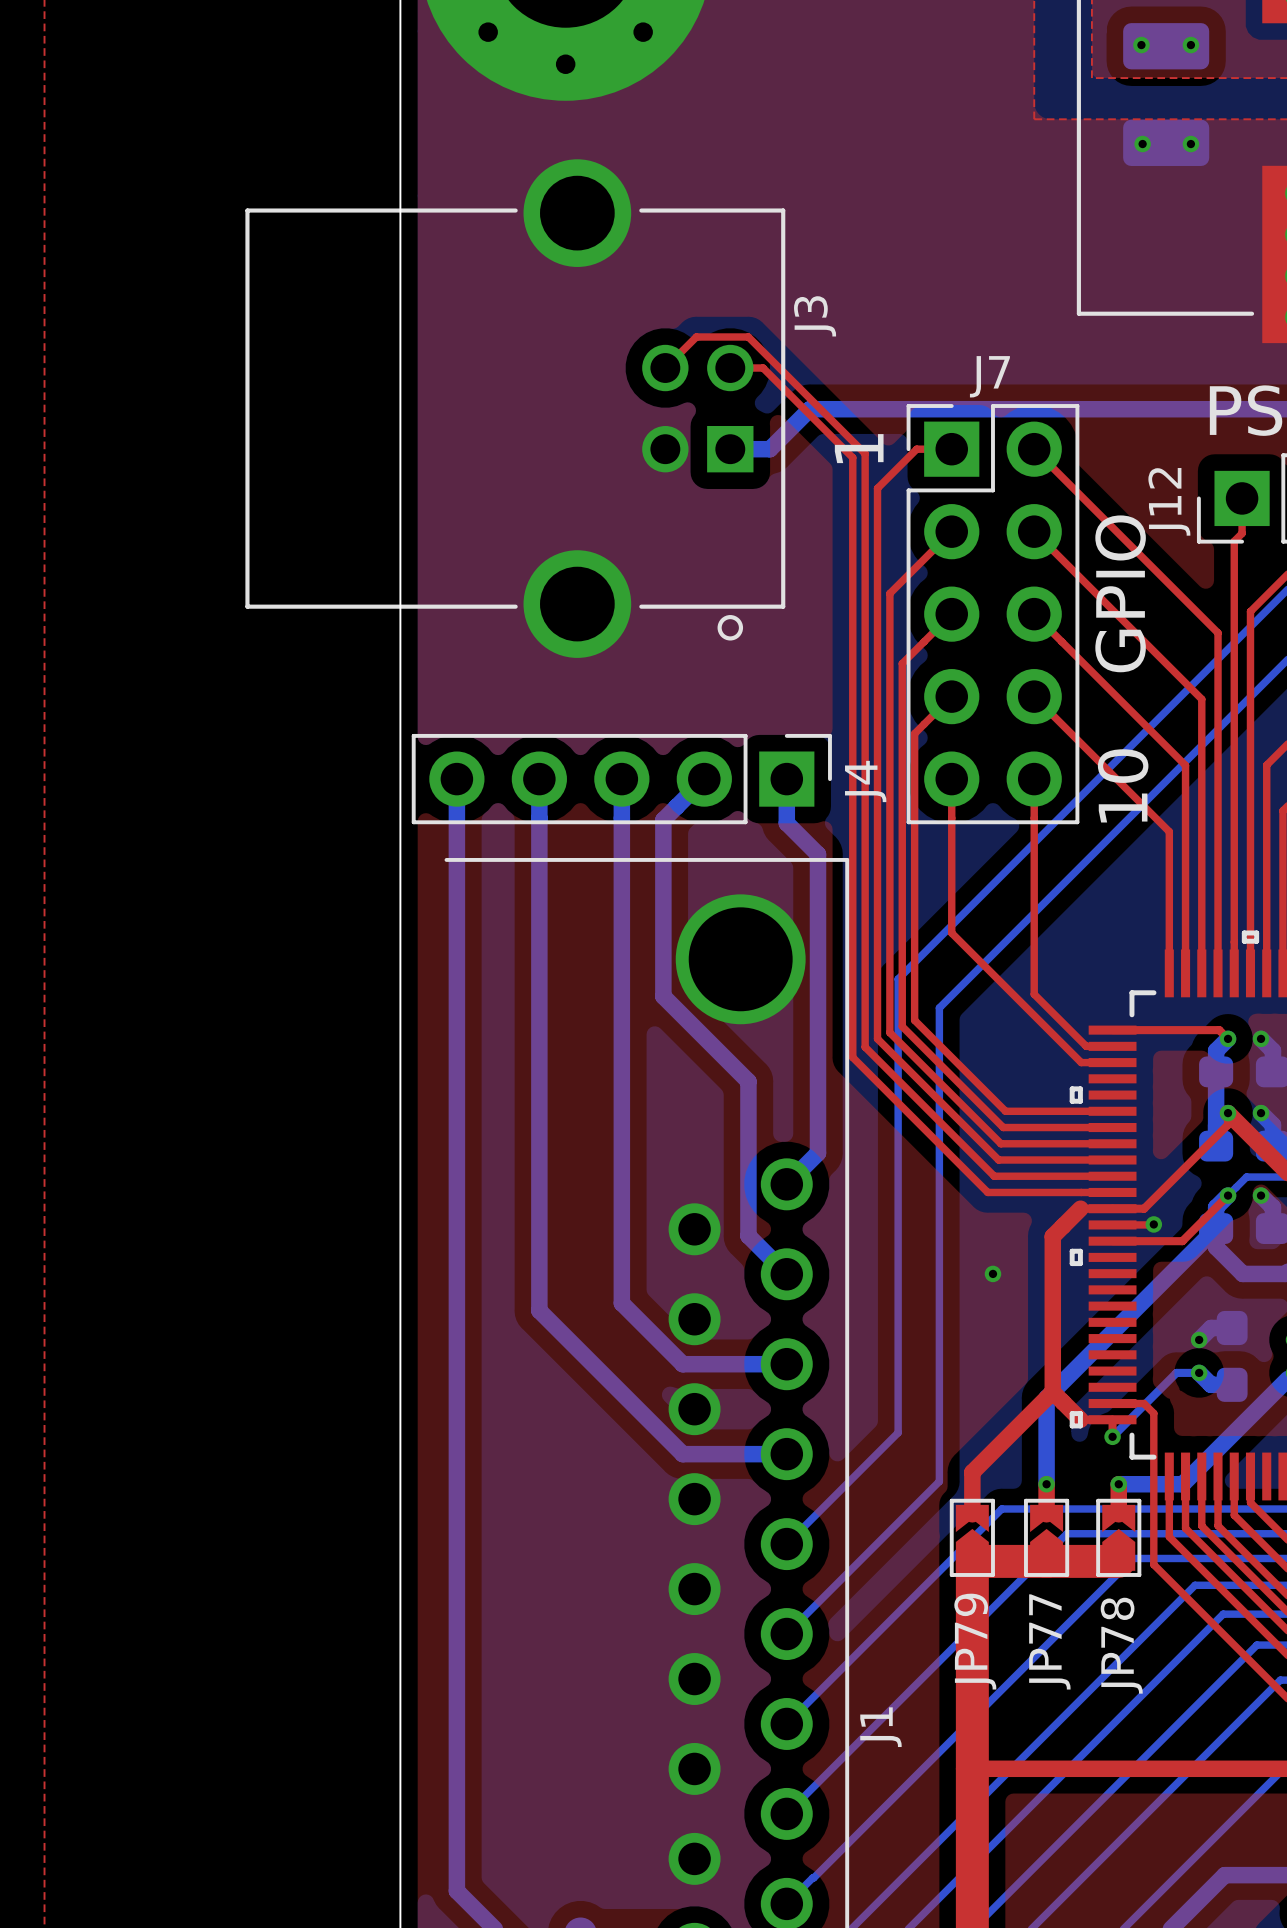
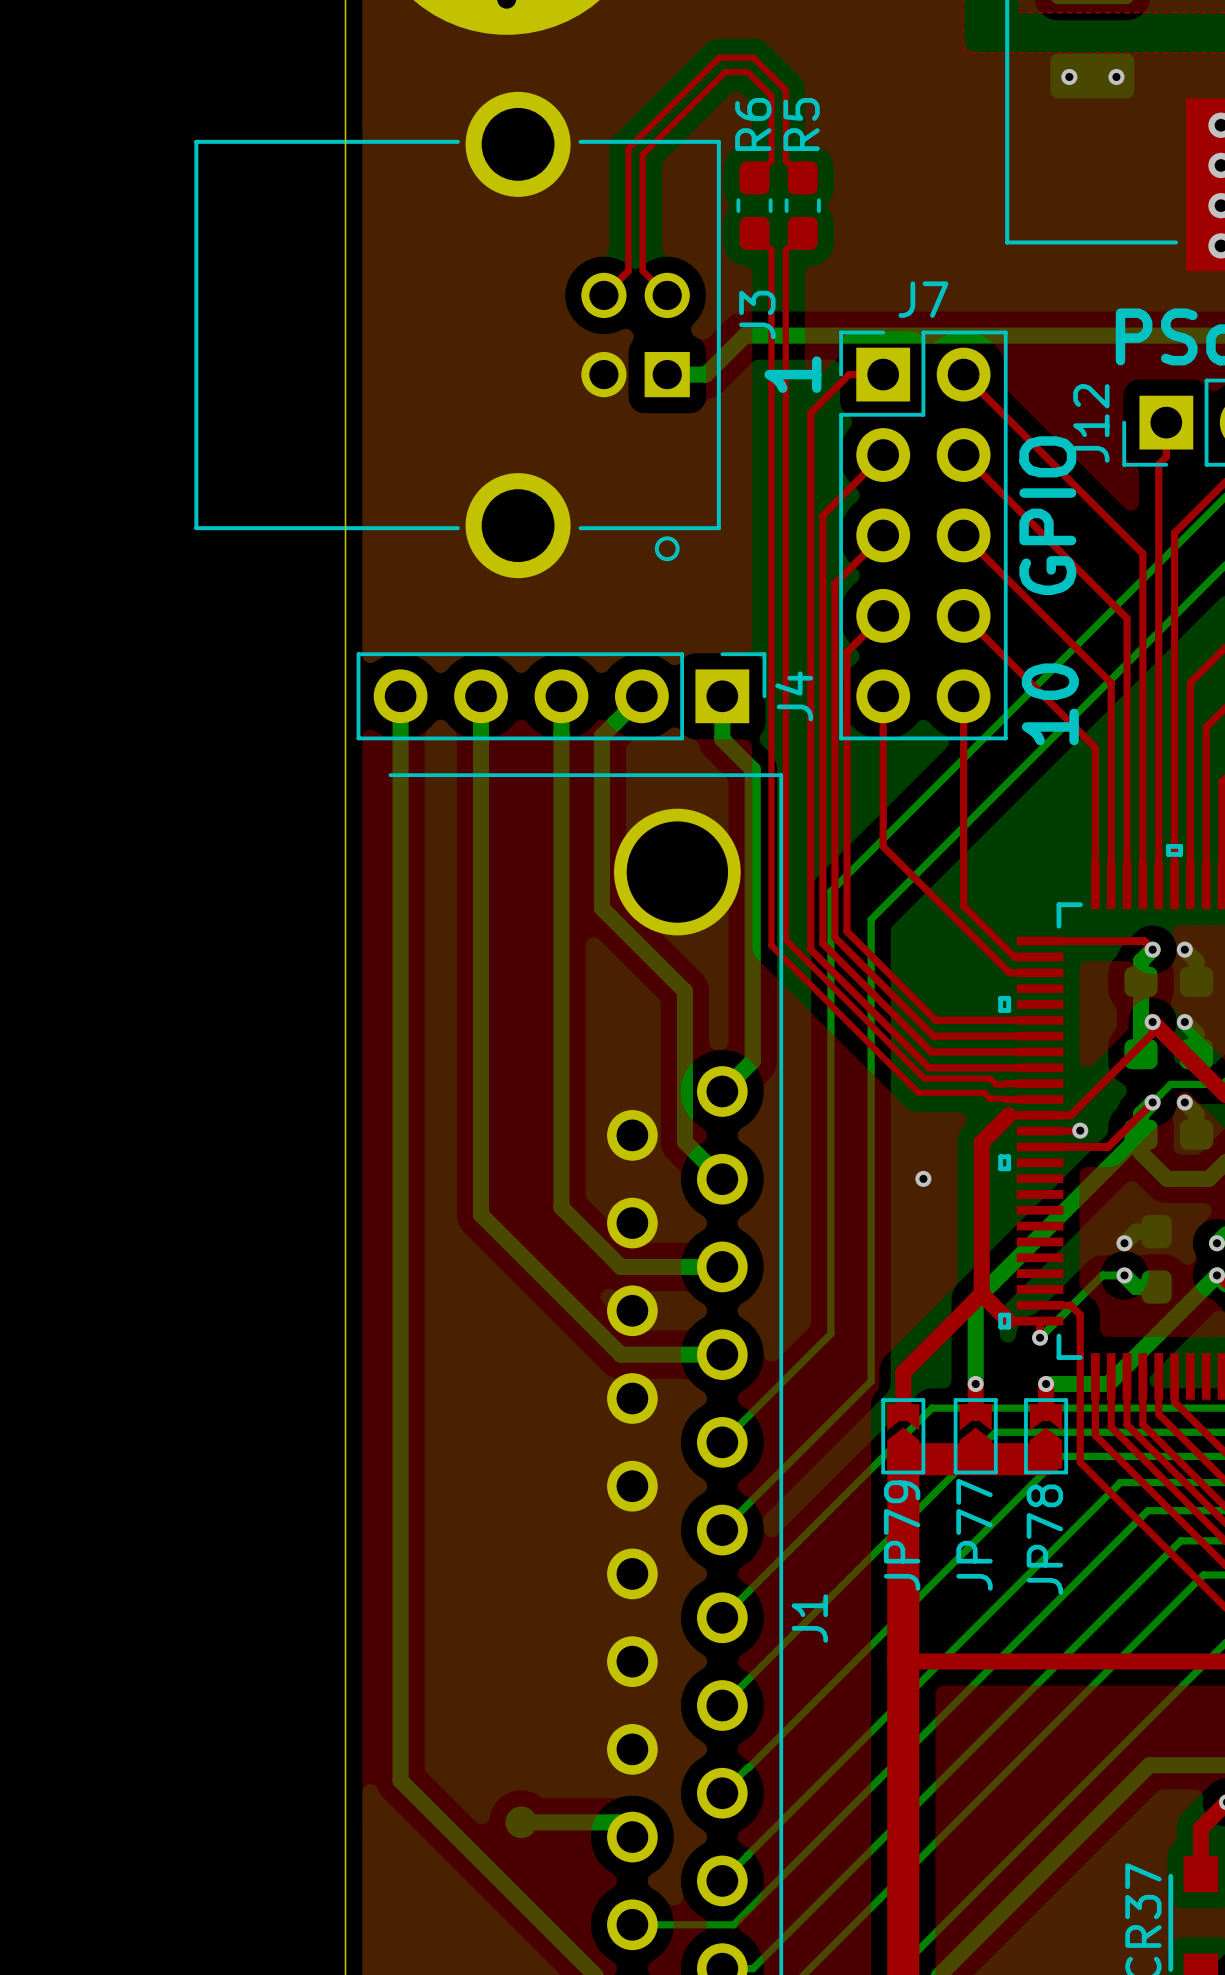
top track: none -> (754, 177) (771, 160) (771, 96) (747, 72) (725, 72) (642, 154) (642, 270) (667, 295)
top track: none -> (802, 177) (785, 160) (785, 90) (753, 57) (719, 57) (628, 148) (628, 270)
R6: none -> (754, 205)
R5: none -> (802, 205)
J3 name position: J3 (815, 316) -> J3 (757, 315)
top track: (690, 342) (696, 336) (748, 336) (865, 453) (865, 1047) (994, 1176) (1076, 1176) -> (802, 233) (785, 250) (785, 939) (924, 1078) (990, 1078) (995, 1084) (1005, 1083)
top track: (730, 368) (763, 368) (852, 457) (852, 1057) (987, 1192) (1076, 1192) -> (754, 233) (771, 250) (771, 945) (918, 1092) (984, 1092) (989, 1098) (1005, 1099)

